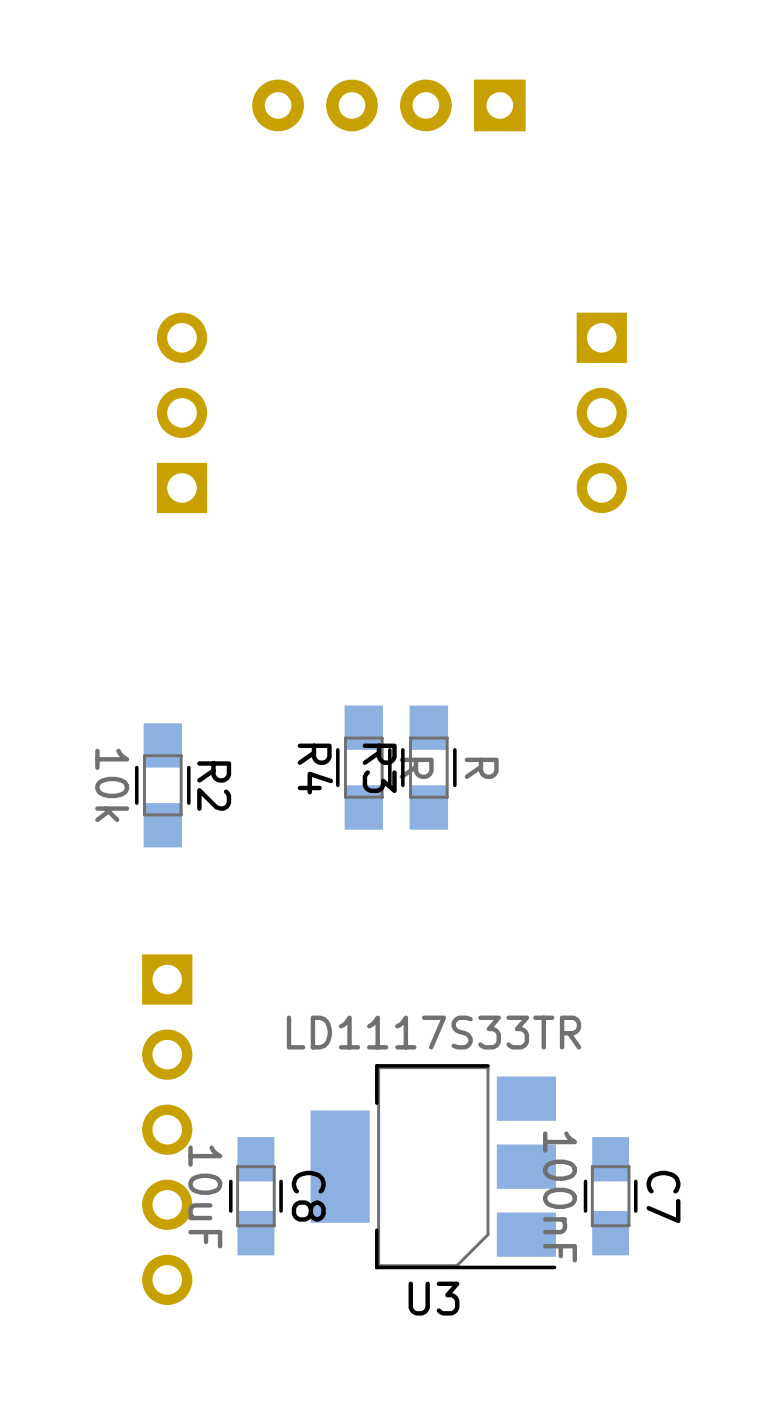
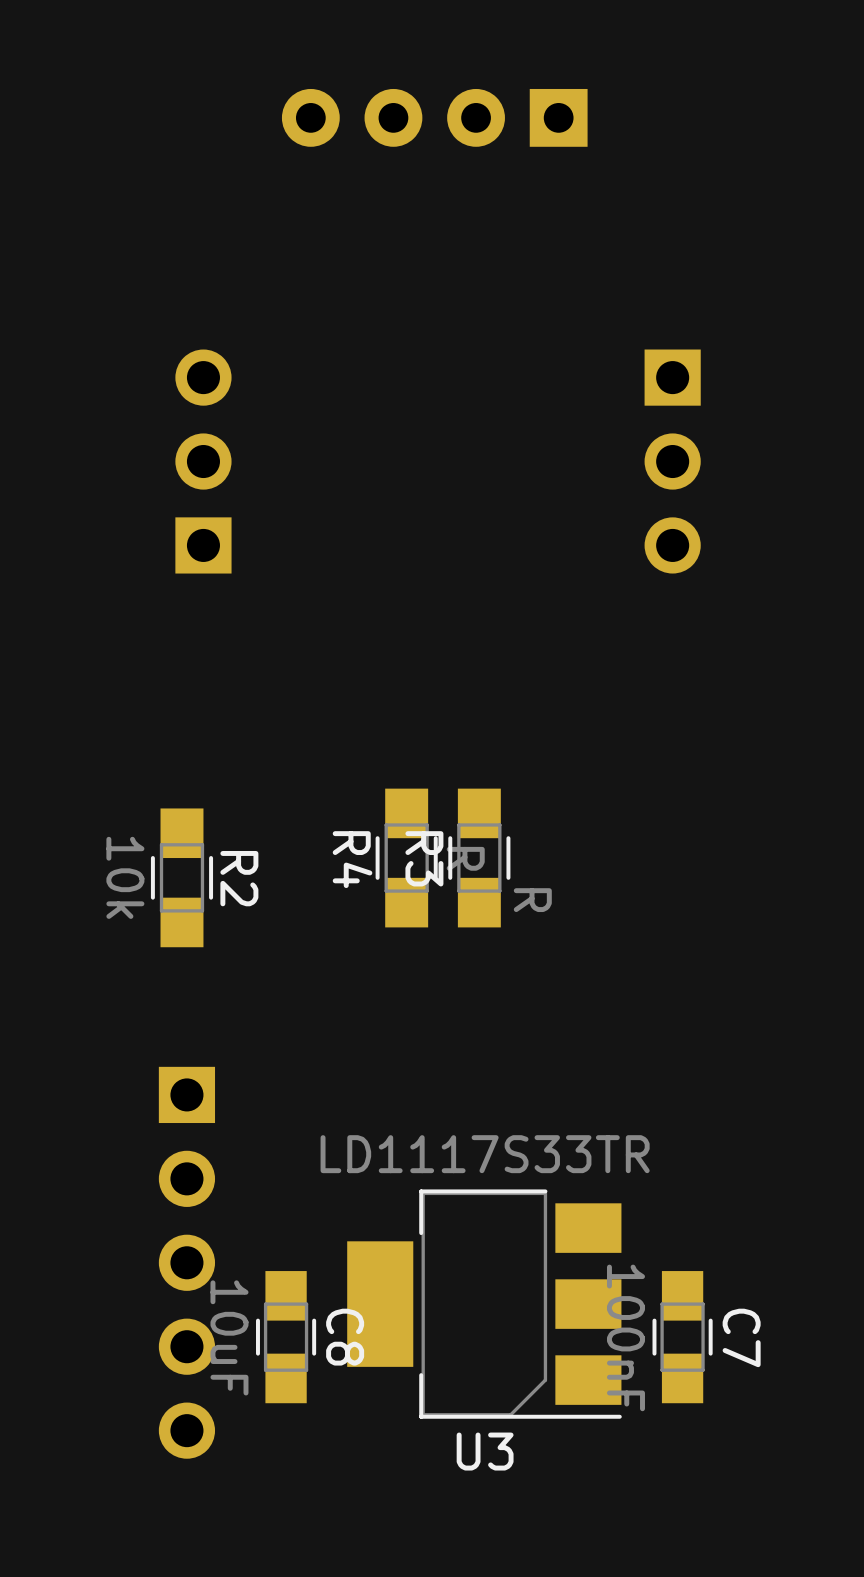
R3 value position: R (481, 768) -> R (532, 900)

